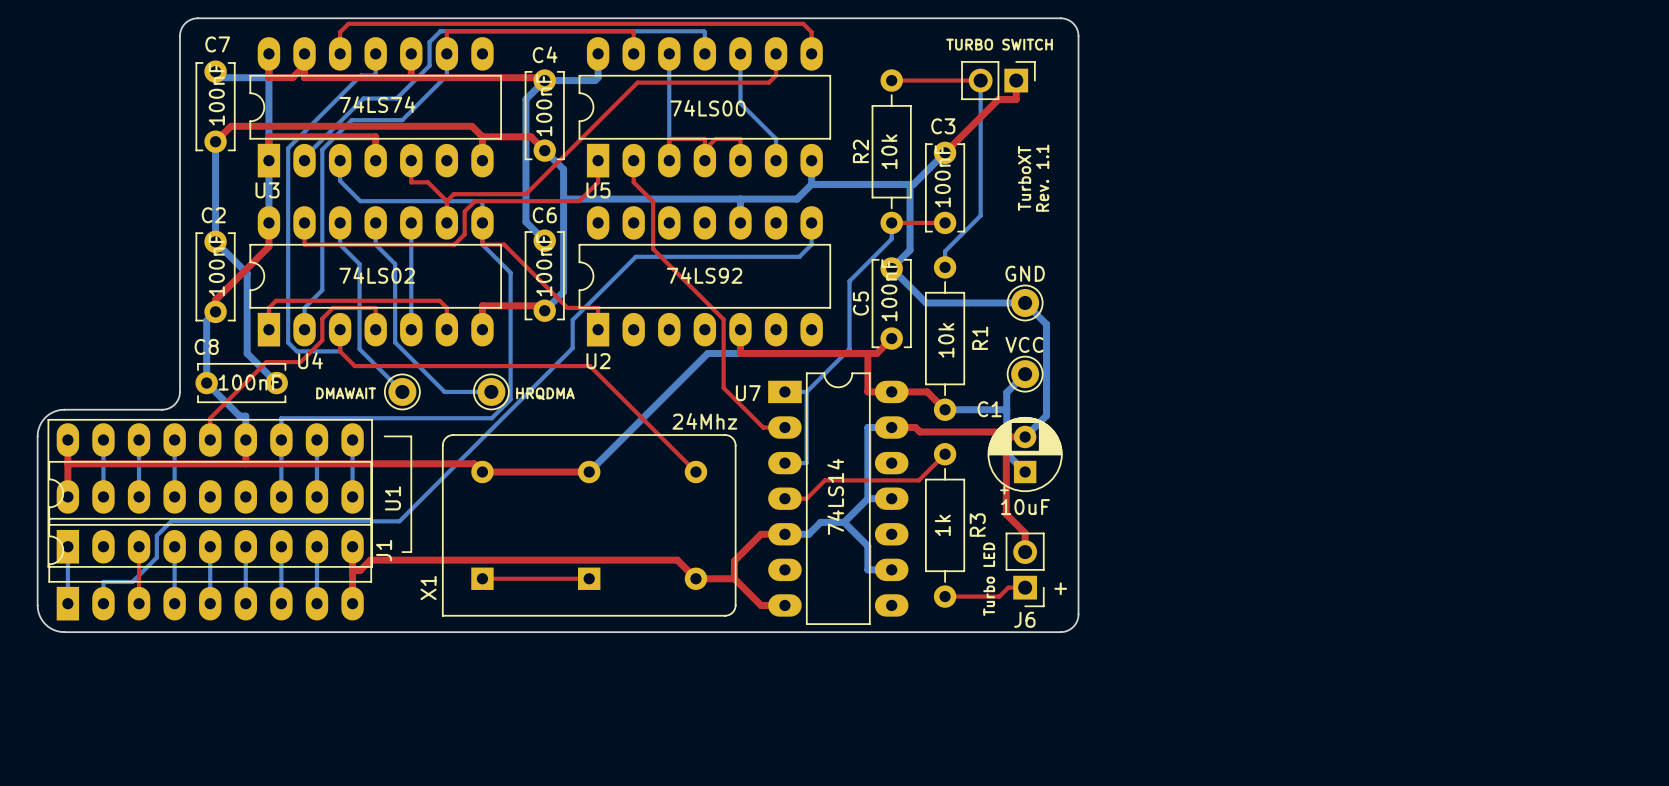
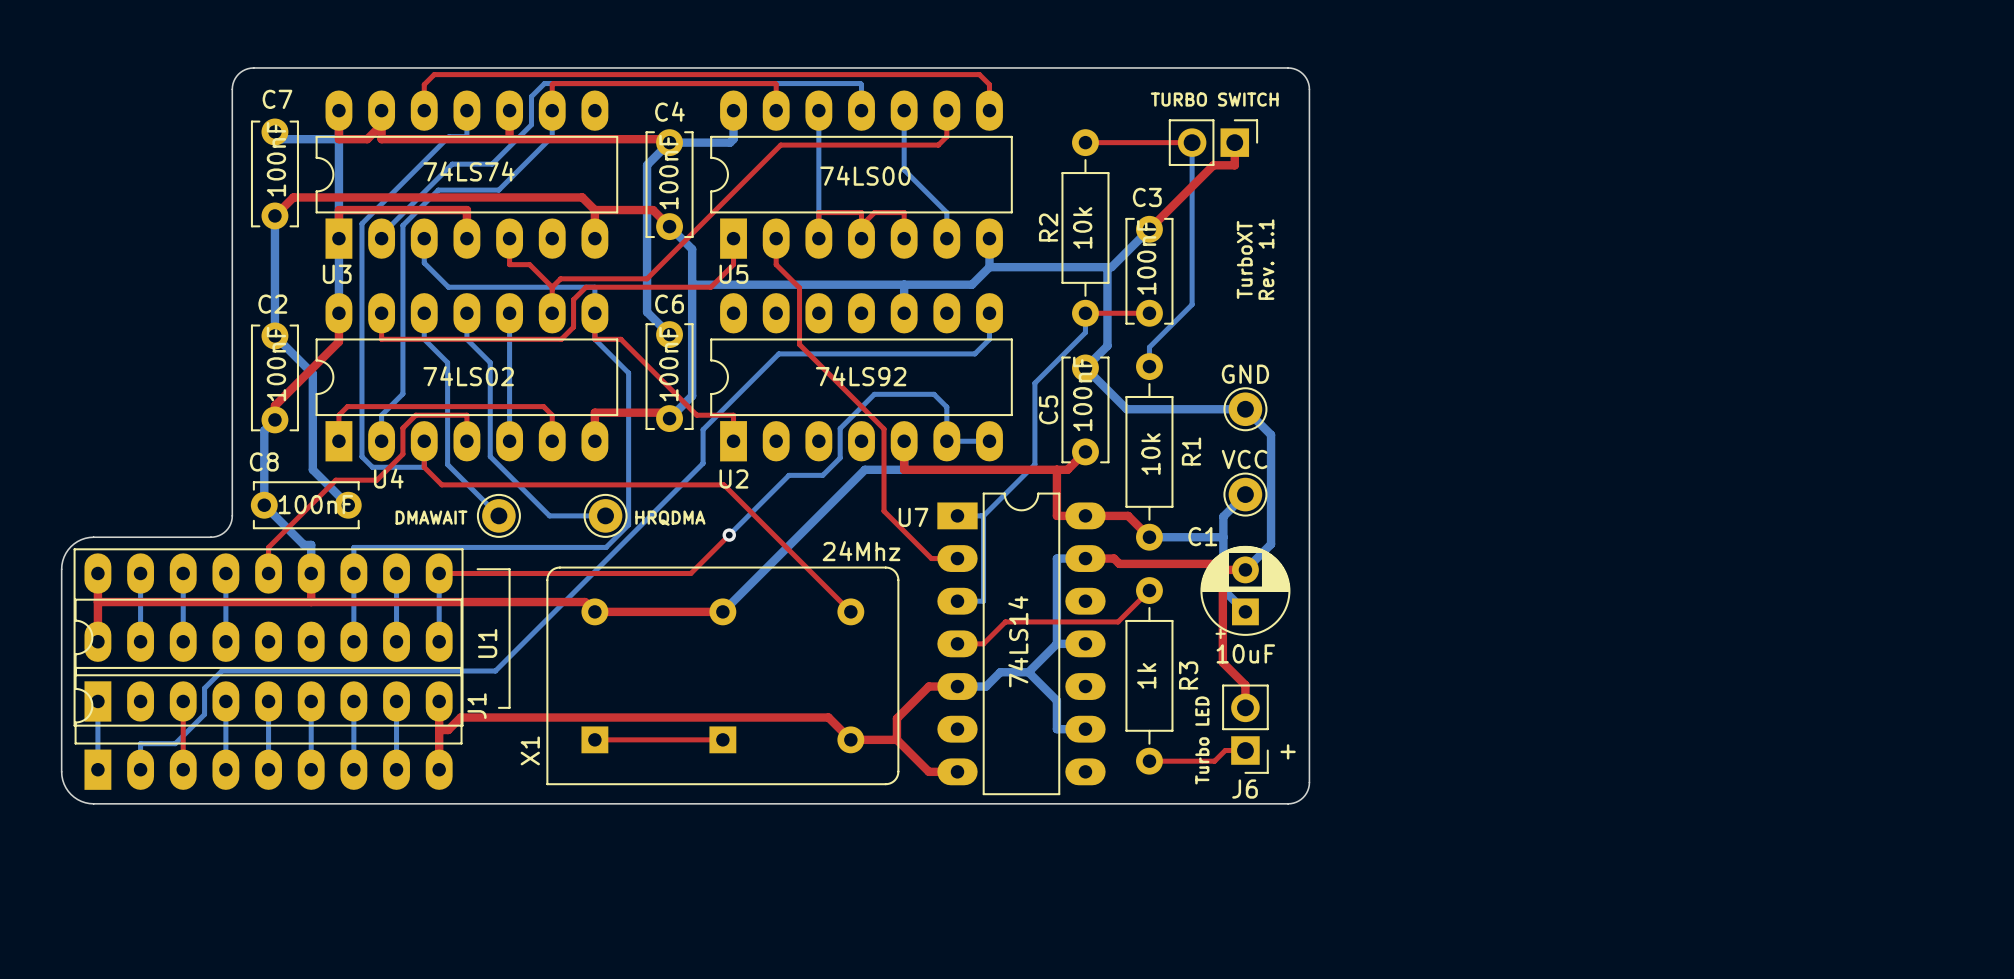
bottom track: none -> (989, 441) (946, 441) (946, 407) (934, 394) (874, 394) (840, 428) (840, 457) (822, 475) (788, 475) (729, 535)
top track: none -> (729, 535) (690, 573) (439, 573)
via: none -> (729, 535)

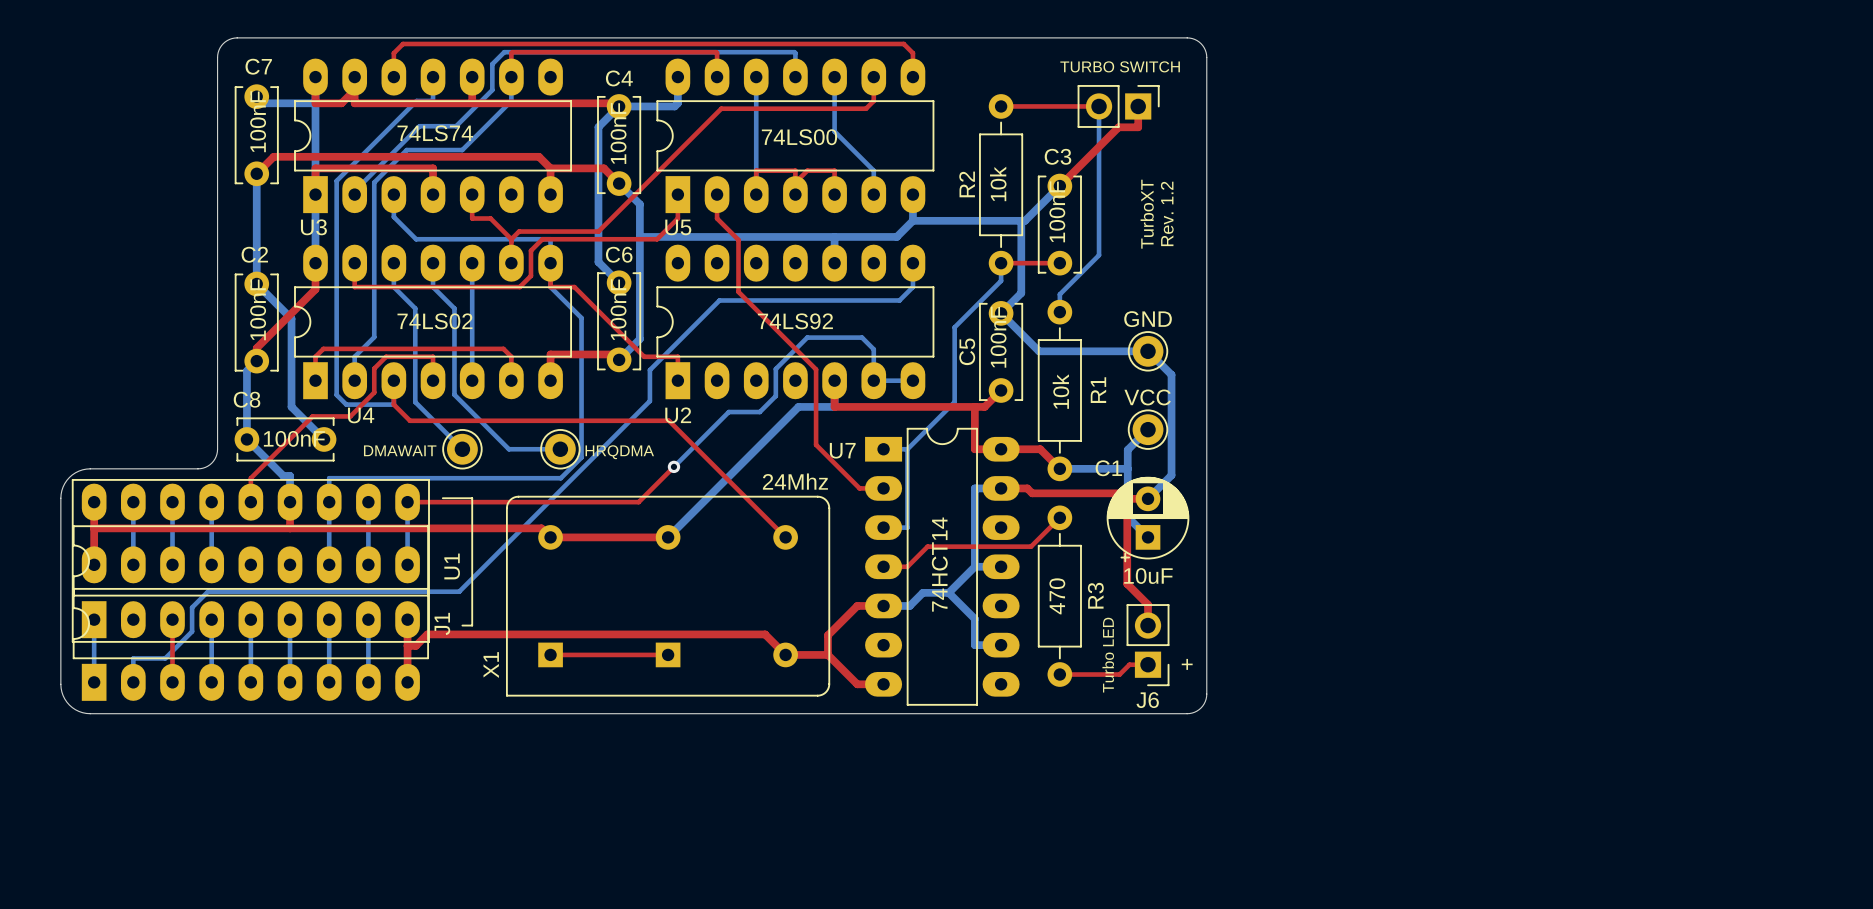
text: Rev. 1.1 (1266, 259) -> Rev. 1.2 (1167, 213)
U7 value: 74LS14 (1018, 641) -> 74HCT14 (939, 564)
R3 value: 1k (1146, 675) -> 470 (1057, 596)

